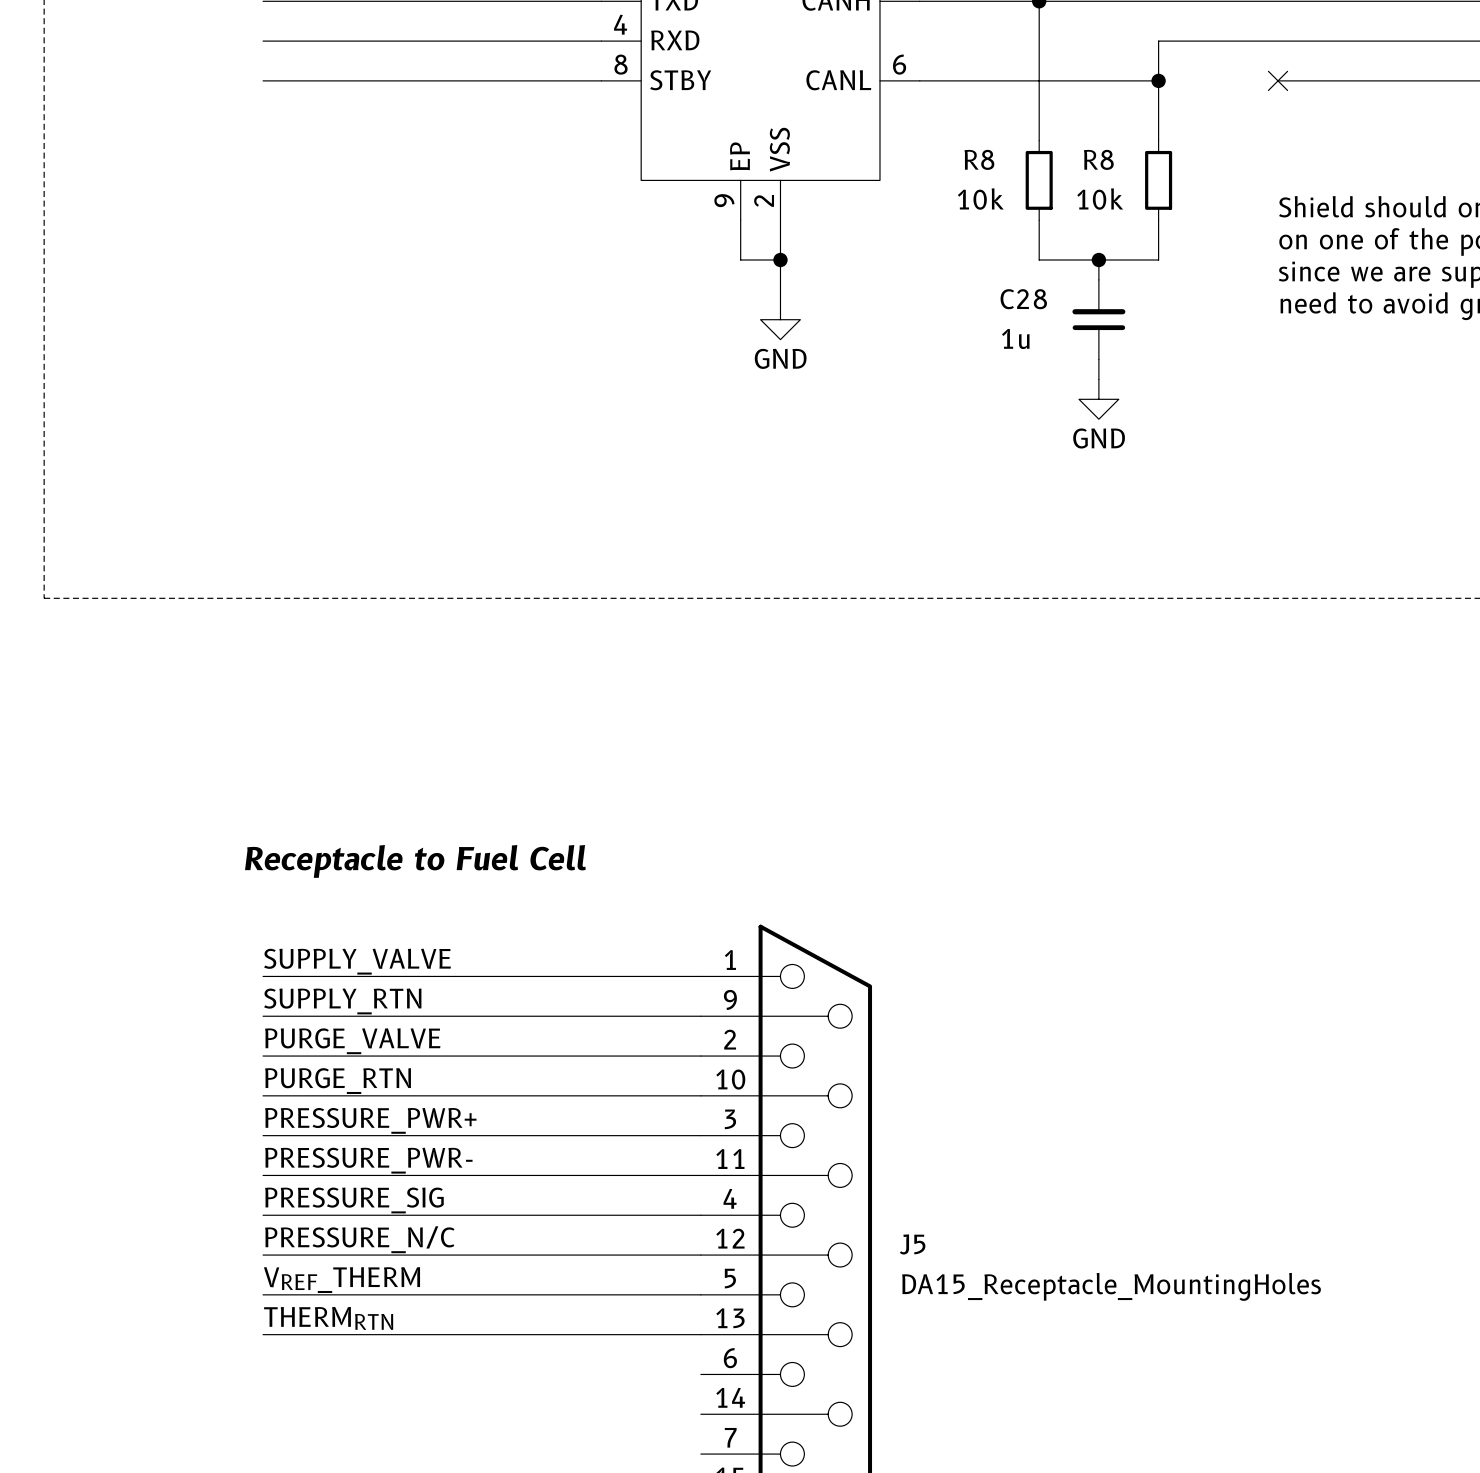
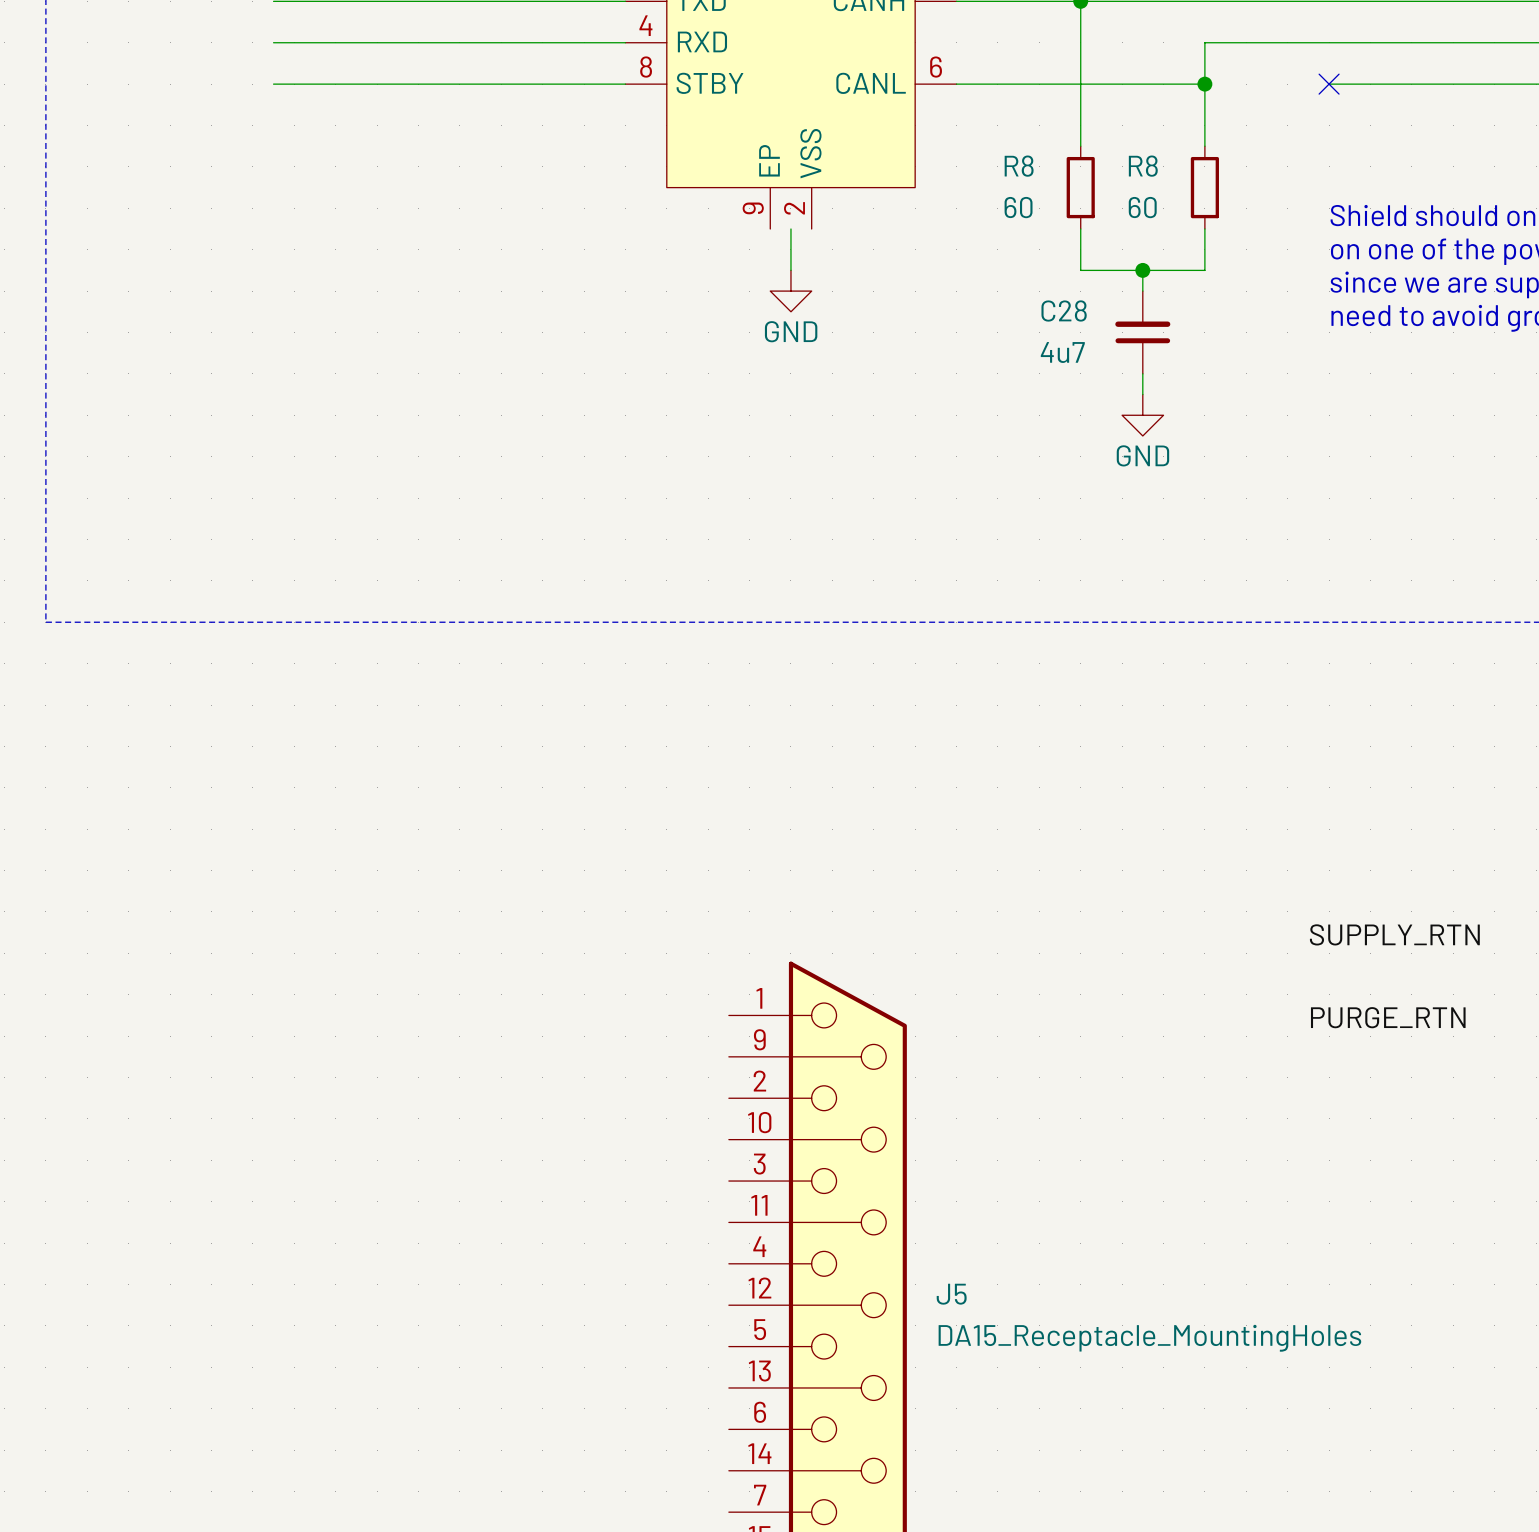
R8 value: 10k (980, 199) -> 60 (1018, 207)
R8 value: 10k (1100, 199) -> 60 (1142, 207)
wire: (740, 220) (740, 260) (780, 260) -> none
wire: none -> (790, 229) (790, 270)
wire: (780, 220) (780, 299) -> none
junction: (780, 260) -> none
power symbol position: GND (780, 319) -> GND (790, 291)
C28 value: 1u (1015, 338) -> 4u7 (1062, 352)
text: Receptacle to Fuel Cell (415, 861) -> none
label: none -> SUPPLY_RTN (1394, 934)
label: SUPPLY_VALVE (357, 961) -> none
wire: (263, 976) (700, 976) -> none
label: none -> PURGE_RTN (1388, 1017)
label: SUPPLY_RTN (342, 1001) -> none
wire: (263, 1016) (700, 1016) -> none
label: PURGE_VALVE (352, 1041) -> none
wire: (263, 1056) (700, 1056) -> none
label: PURGE_RTN (338, 1081) -> none
wire: (263, 1095) (700, 1095) -> none
label: PRESSURE_PWR+ (370, 1120) -> none
wire: (263, 1135) (700, 1135) -> none
label: PRESSURE_PWR- (368, 1160) -> none
wire: (263, 1175) (700, 1175) -> none
label: PRESSURE_SIG (354, 1200) -> none
wire: (263, 1215) (700, 1215) -> none
label: PRESSURE_N/C (359, 1239) -> none
wire: (263, 1255) (700, 1255) -> none
label: VREF_THERM (341, 1280) -> none
wire: (263, 1294) (700, 1294) -> none
label: THERMRTN (328, 1318) -> none
wire: (263, 1334) (700, 1334) -> none

